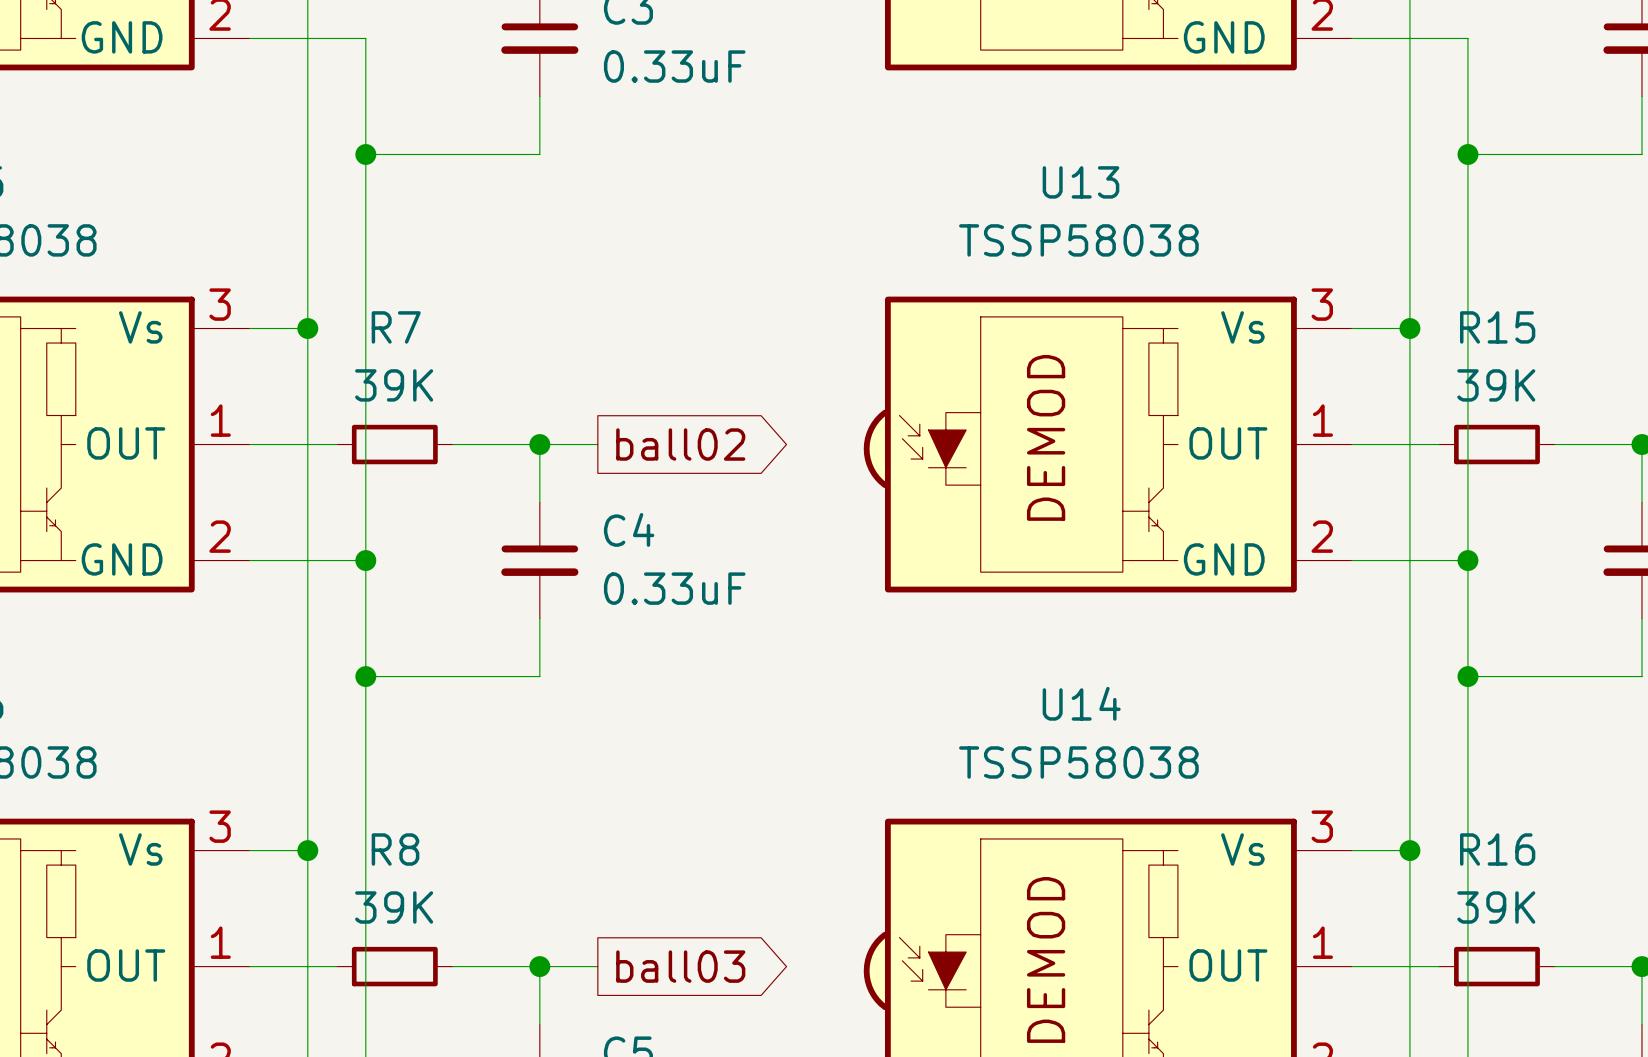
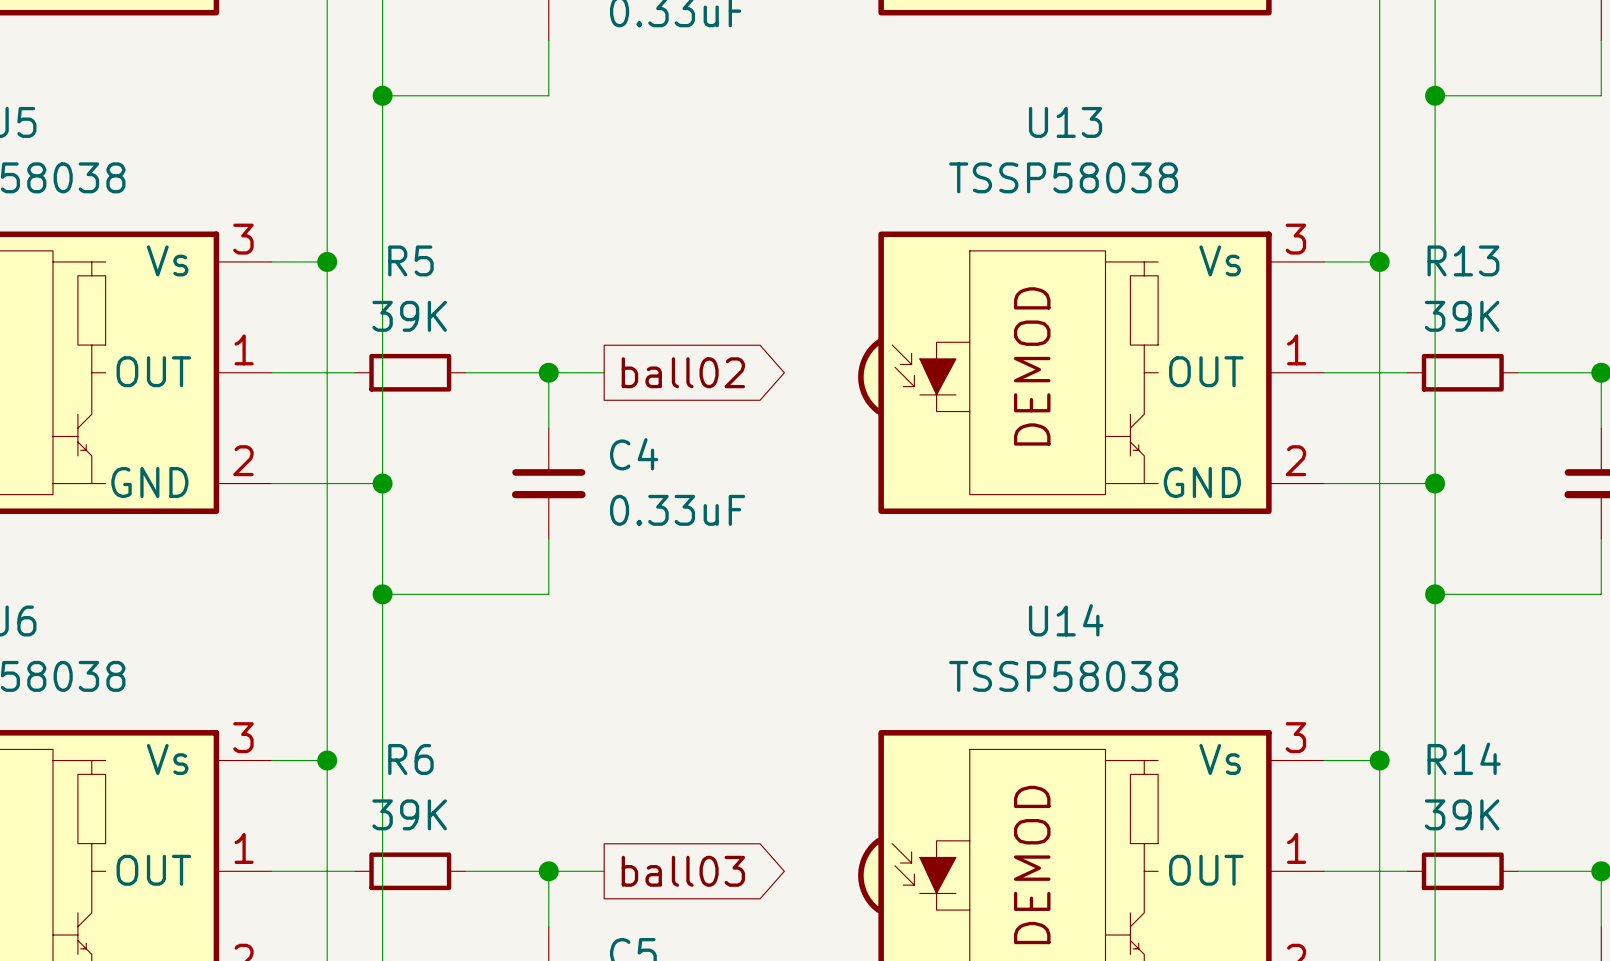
R7 name: R7 (396, 327) -> R5 (410, 260)
R15 name: R15 (1497, 327) -> R13 (1463, 260)
R8 name: R8 (395, 849) -> R6 (410, 759)
R16 name: R16 (1497, 849) -> R14 (1464, 758)

